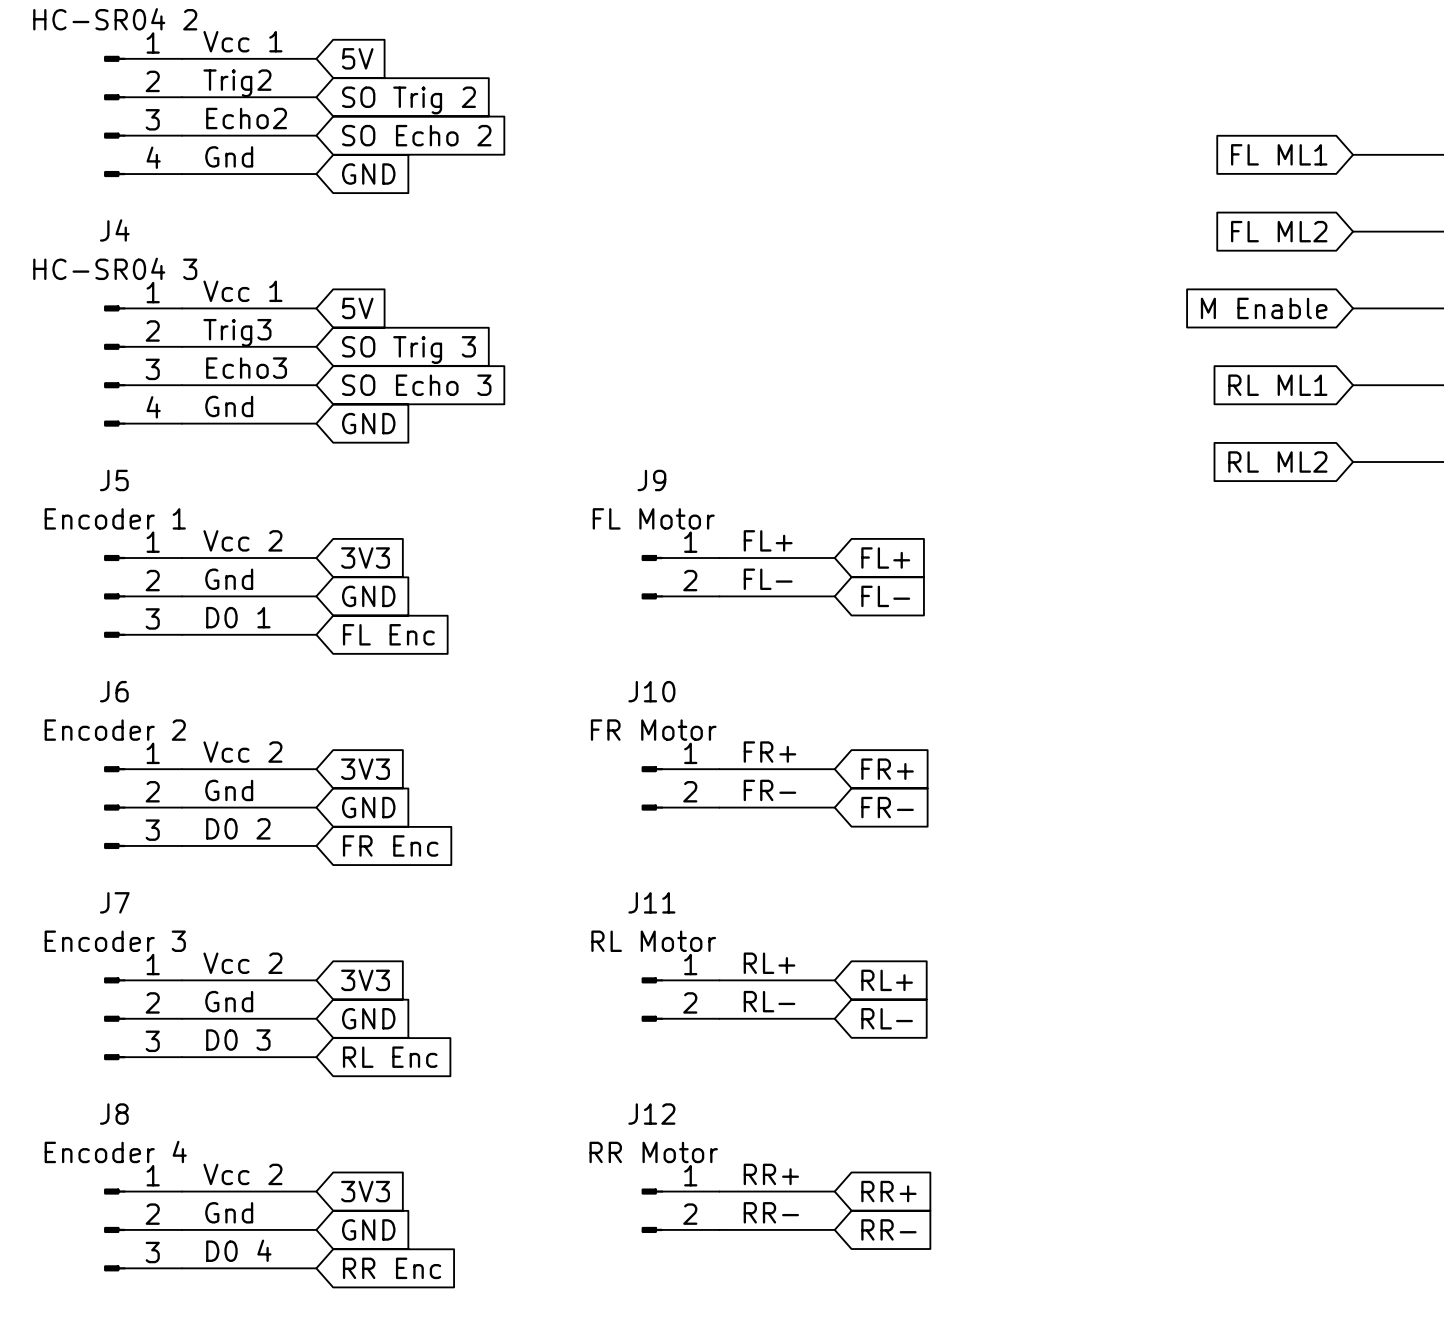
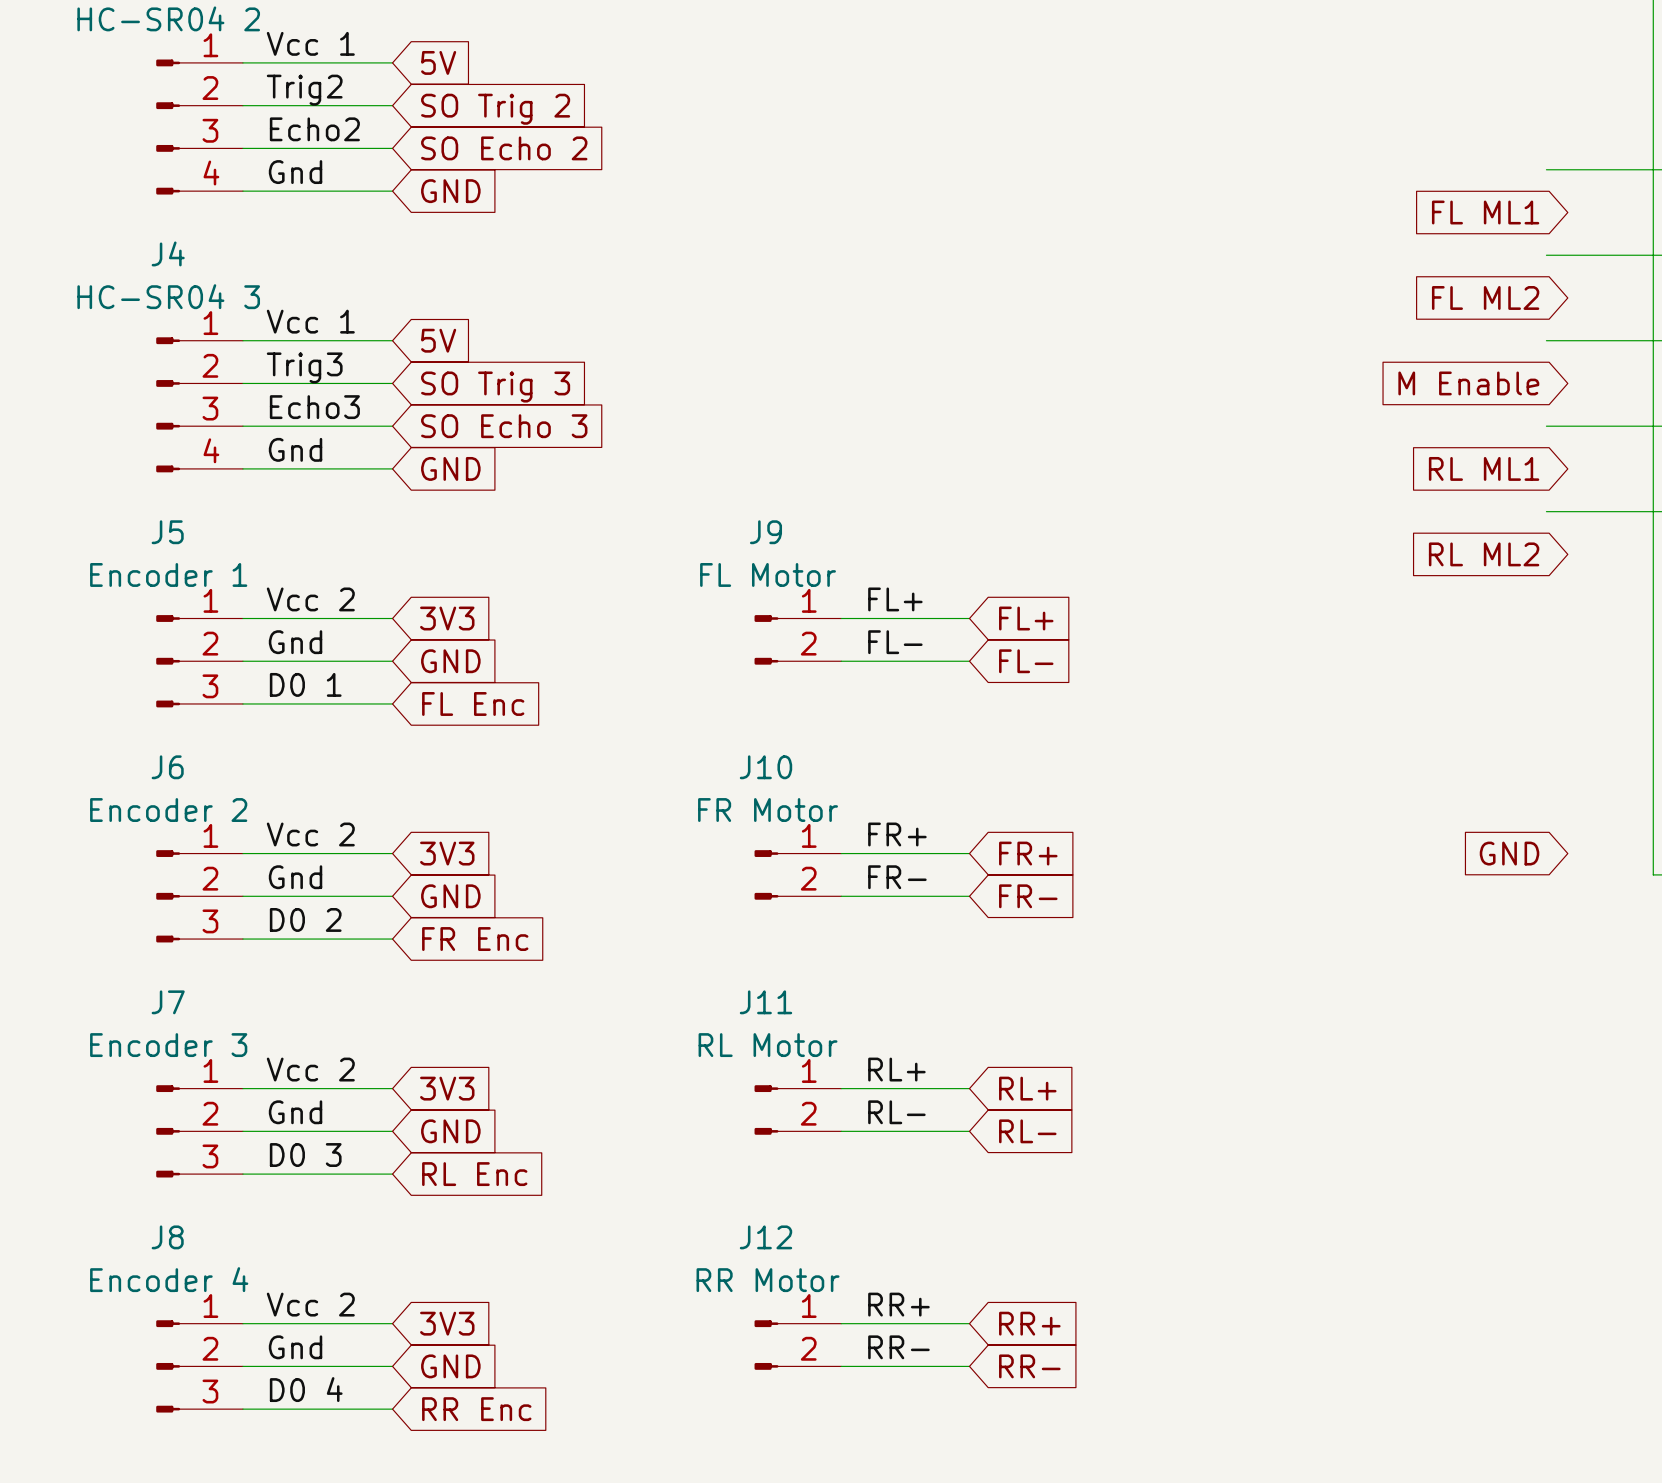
global label position: FL ML1 (1279, 154) -> FL ML1 (1485, 212)
global label position: FL ML2 (1279, 231) -> FL ML2 (1485, 297)
global label position: M Enable (1264, 308) -> M Enable (1468, 383)
global label position: RL ML1 (1277, 385) -> RL ML1 (1484, 468)
global label position: RL ML2 (1277, 462) -> RL ML2 (1484, 554)
global label: none -> GND (1509, 853)

